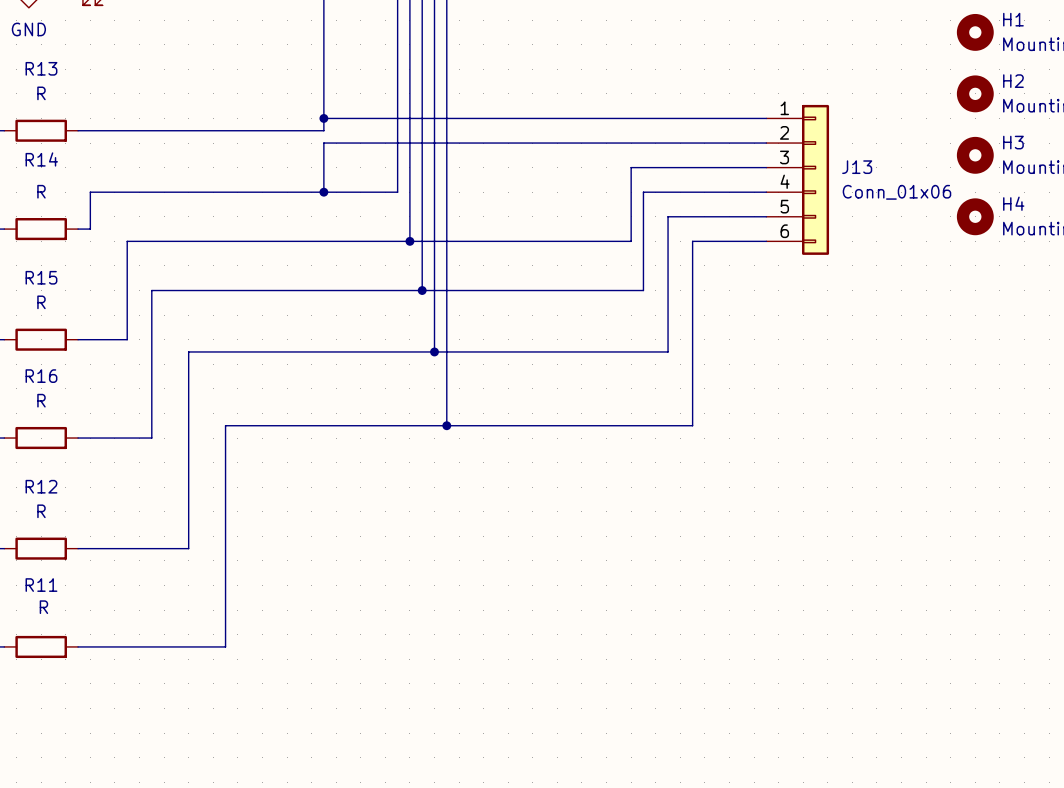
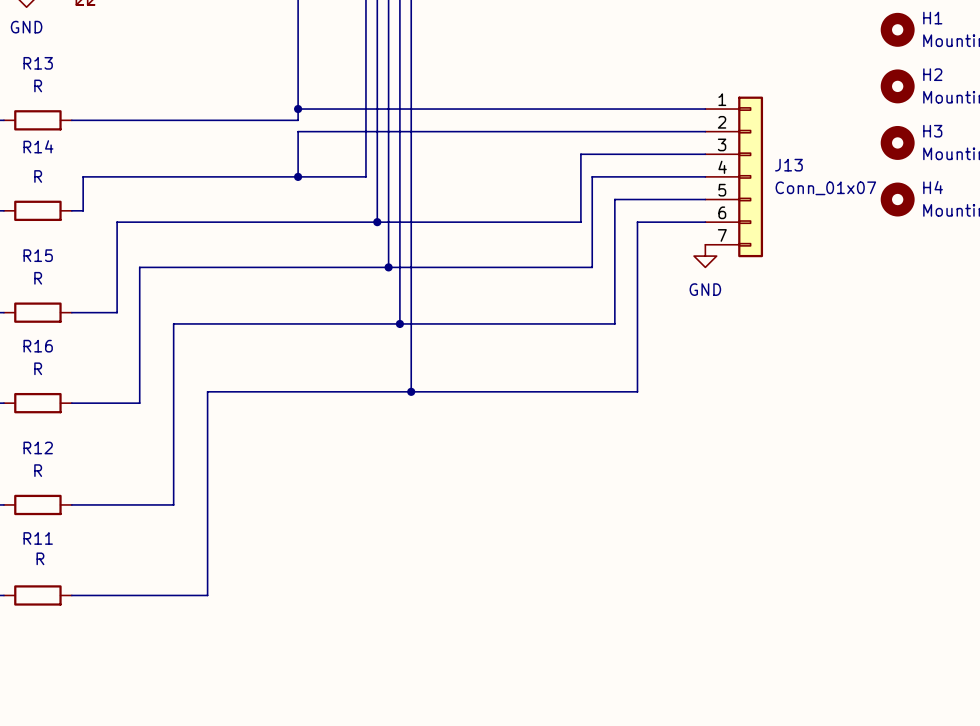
J13 symbol: [766, 104, 830, 255] -> [705, 96, 764, 258]
J13 value: Conn_01x06 (896, 192) -> Conn_01x07 (825, 188)
power symbol: none -> GND (705, 256)

